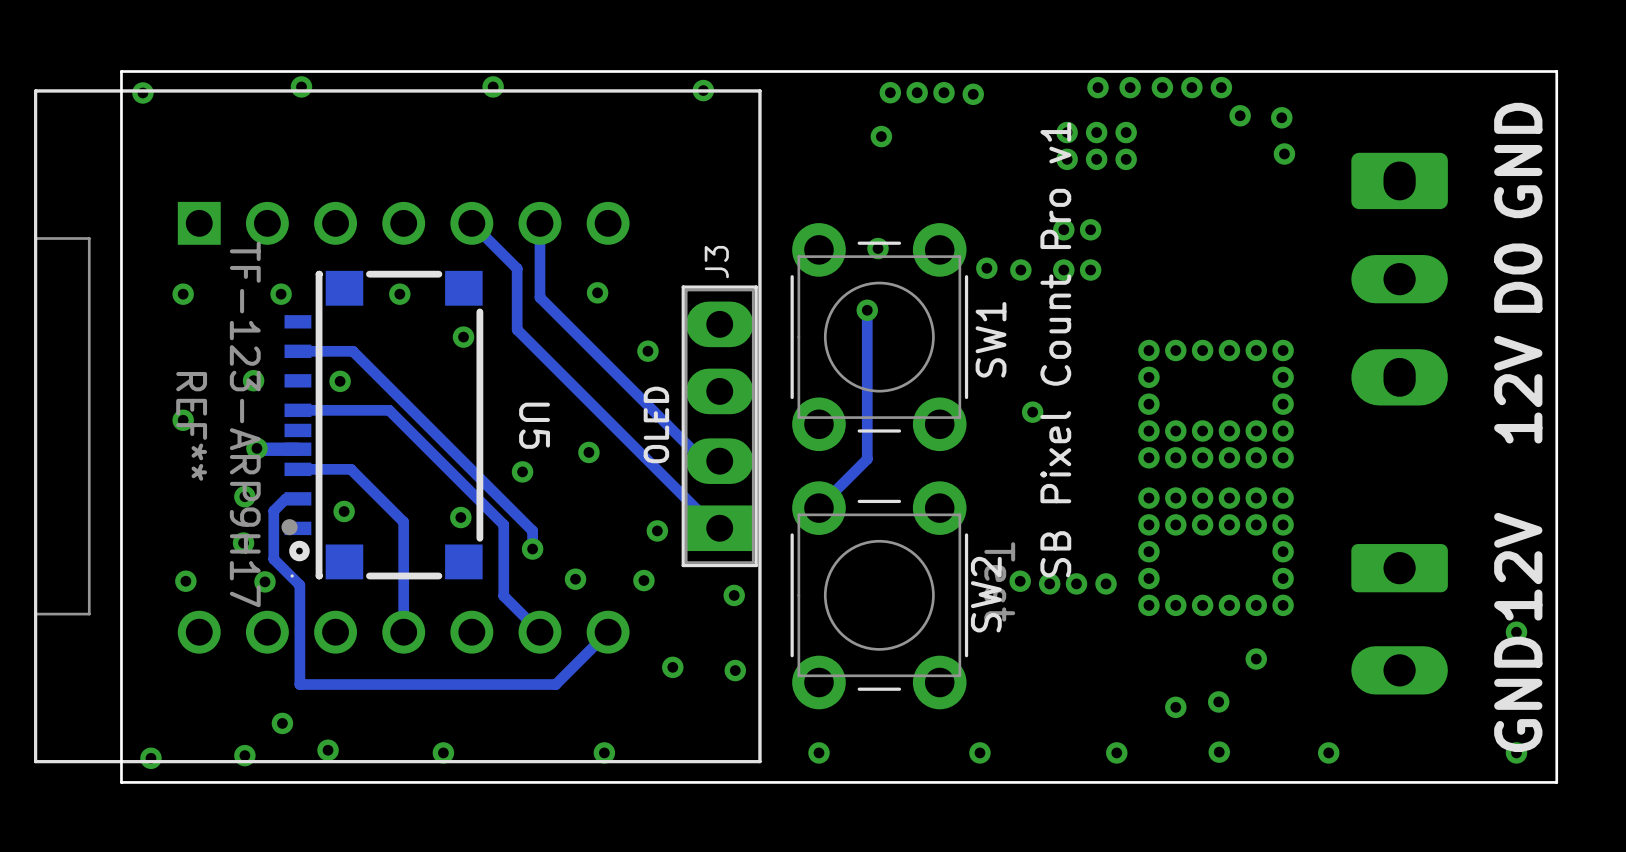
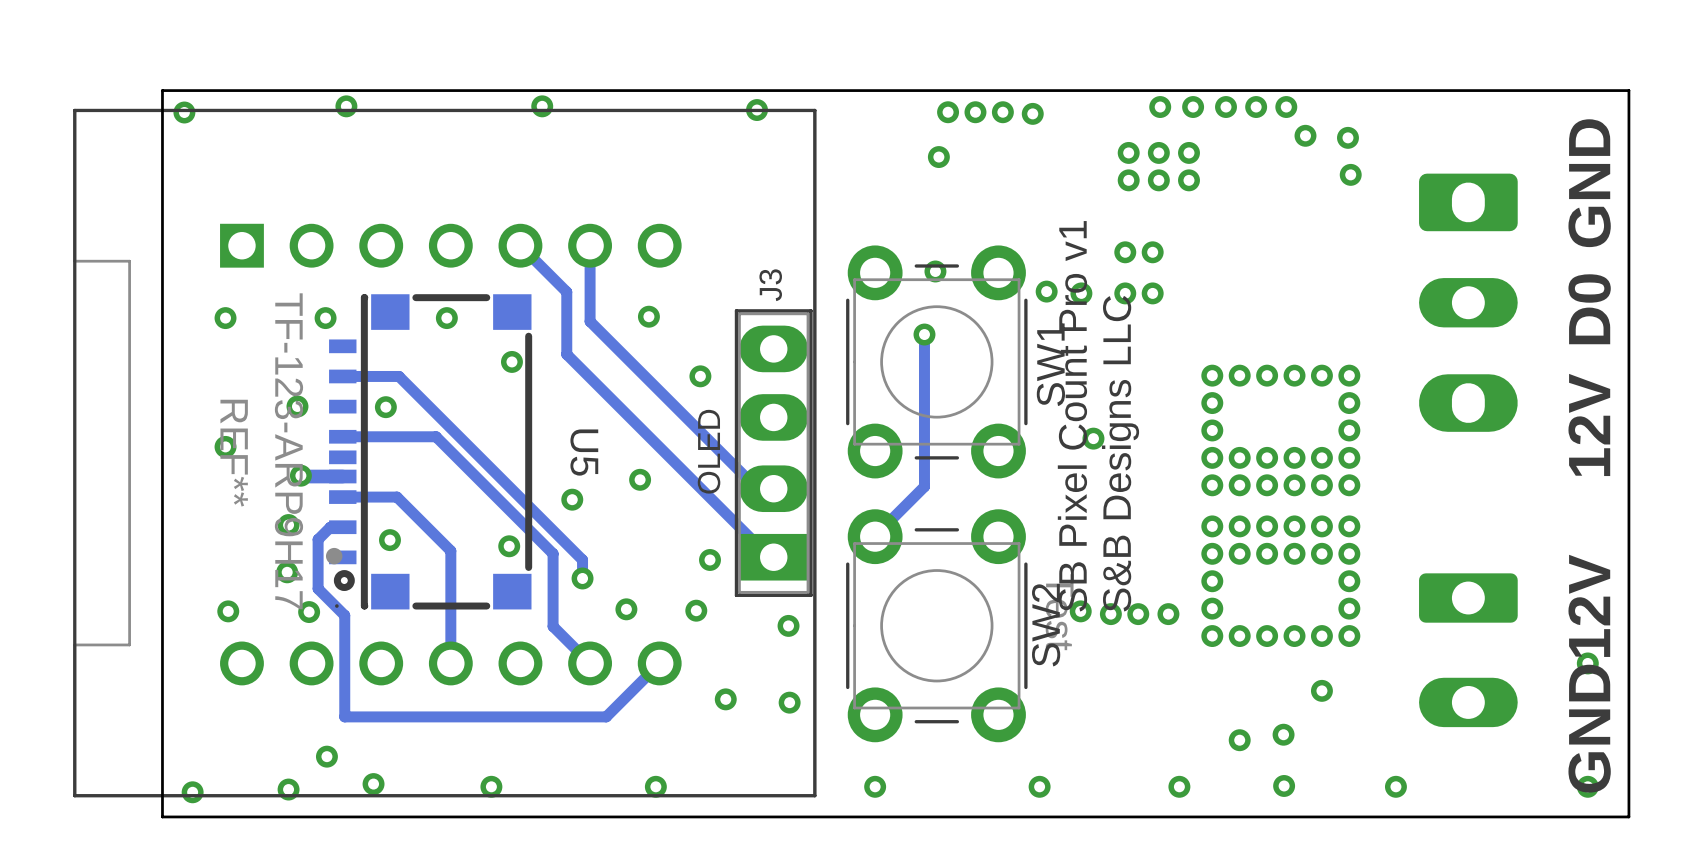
text: none -> SB Pixel Count Pro v1 (1072, 416)
text: SB Pixel Count Pro v1 (1055, 349) -> S&B Designs LLC (1120, 453)

